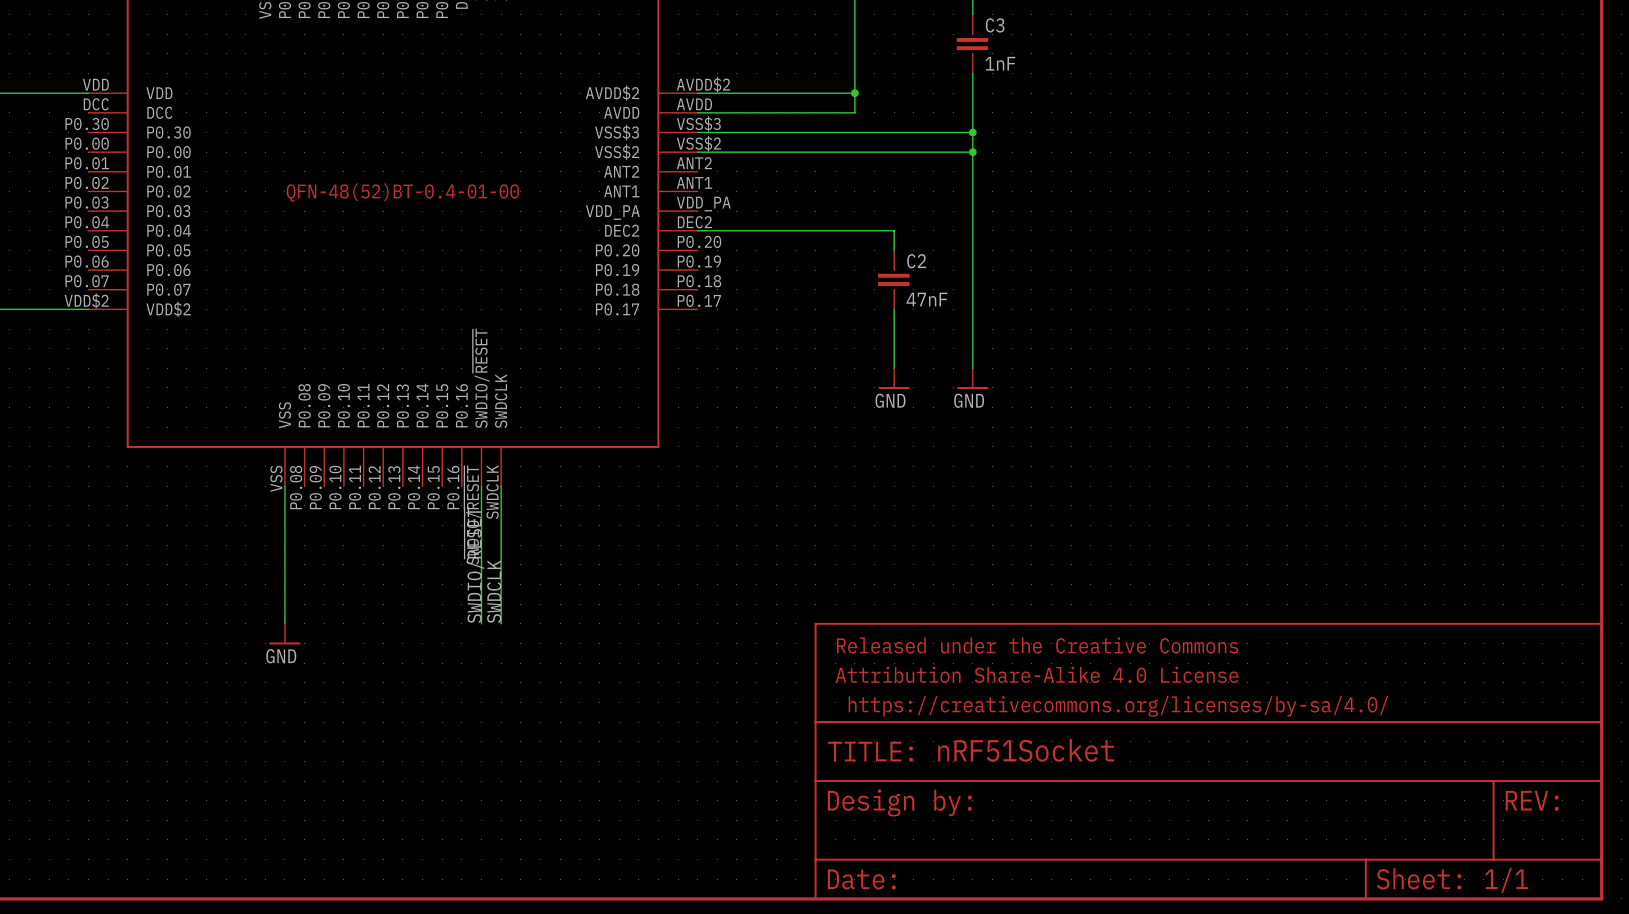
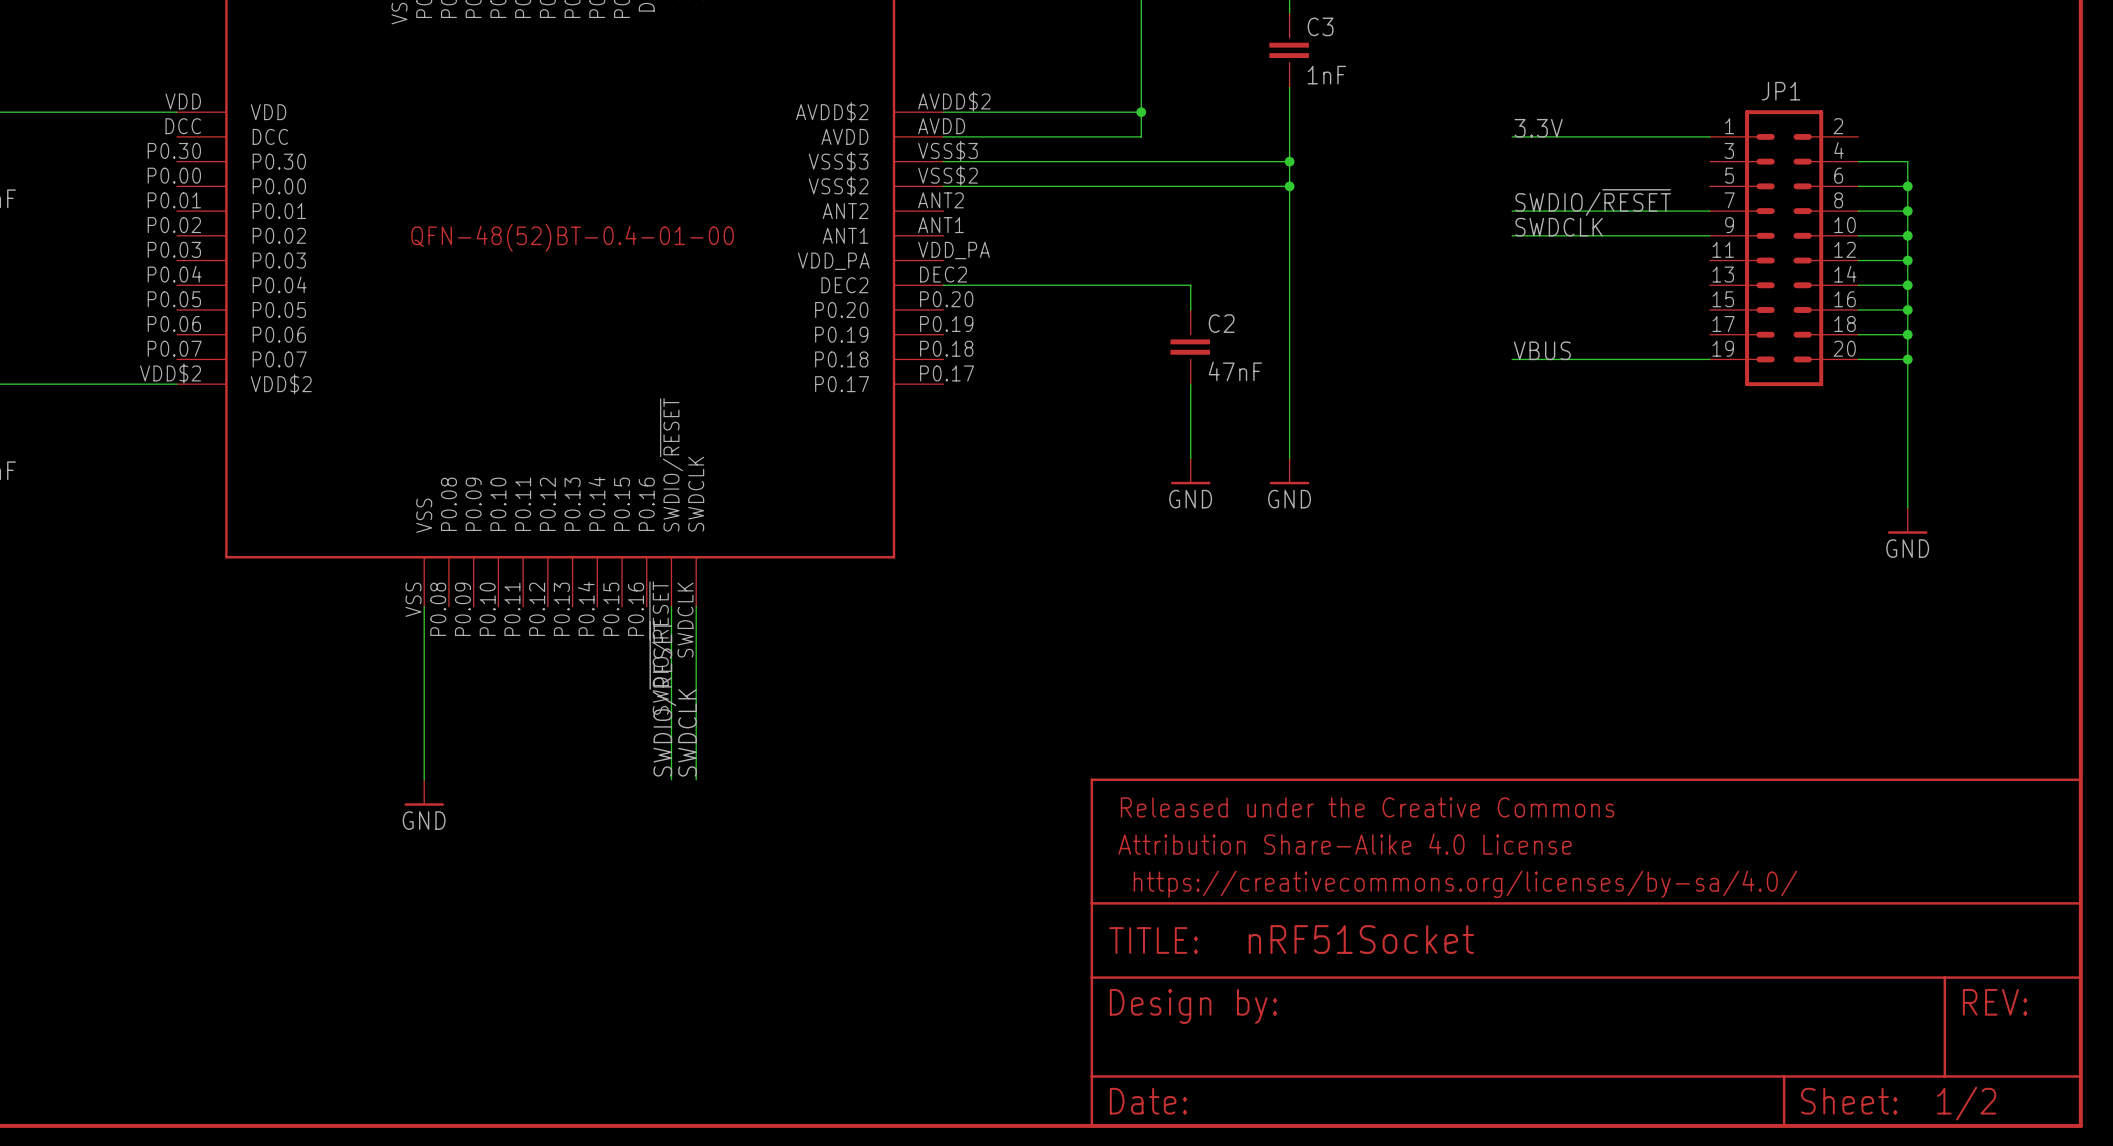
label: none -> 3.3V (1538, 128)
wire: none -> (1512, 136) (1709, 136)
wire: none -> (1858, 161) (1907, 161) (1907, 507)
wire: none -> (1858, 186) (1907, 186)
junction: none -> (1907, 186)
label: none -> SWDIO/~{RESET} (1593, 202)
wire: none -> (1512, 211) (1709, 211)
wire: none -> (1858, 211) (1907, 211)
junction: none -> (1907, 211)
label: none -> SWDCLK (1559, 227)
wire: none -> (1512, 235) (1709, 235)
wire: none -> (1858, 235) (1907, 235)
junction: none -> (1907, 235)
JP1: none -> (1784, 248)
wire: none -> (1858, 260) (1907, 260)
junction: none -> (1907, 260)
wire: none -> (1858, 285) (1907, 285)
junction: none -> (1907, 285)
wire: none -> (1858, 309) (1907, 309)
junction: none -> (1907, 309)
wire: none -> (1858, 334) (1907, 334)
junction: none -> (1907, 334)
label: none -> VBUS (1542, 350)
wire: none -> (1512, 359) (1709, 359)
wire: none -> (1858, 359) (1907, 359)
junction: none -> (1907, 359)
power symbol: none -> GND (1907, 520)
part text: 1/1 (1506, 880) -> 1/2 (1966, 1103)

